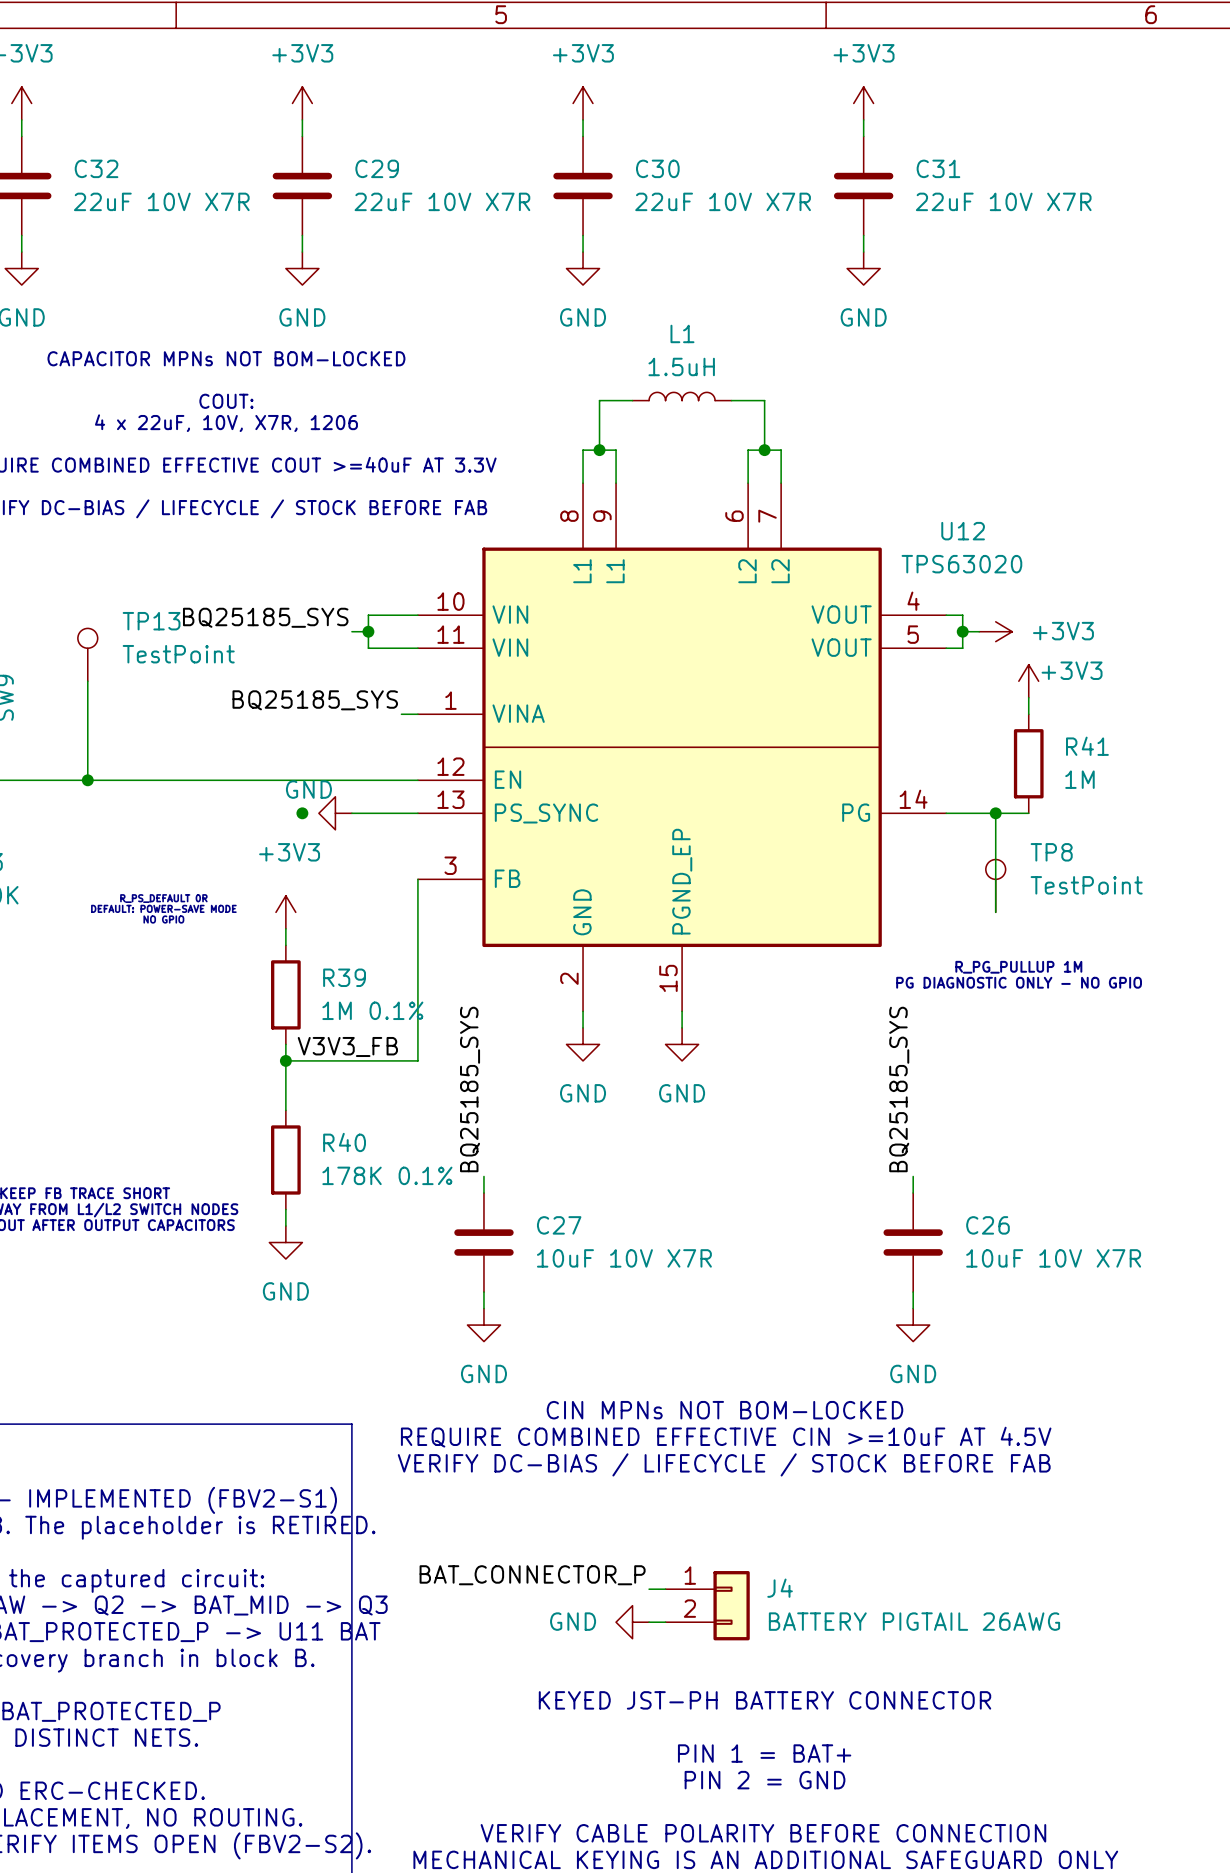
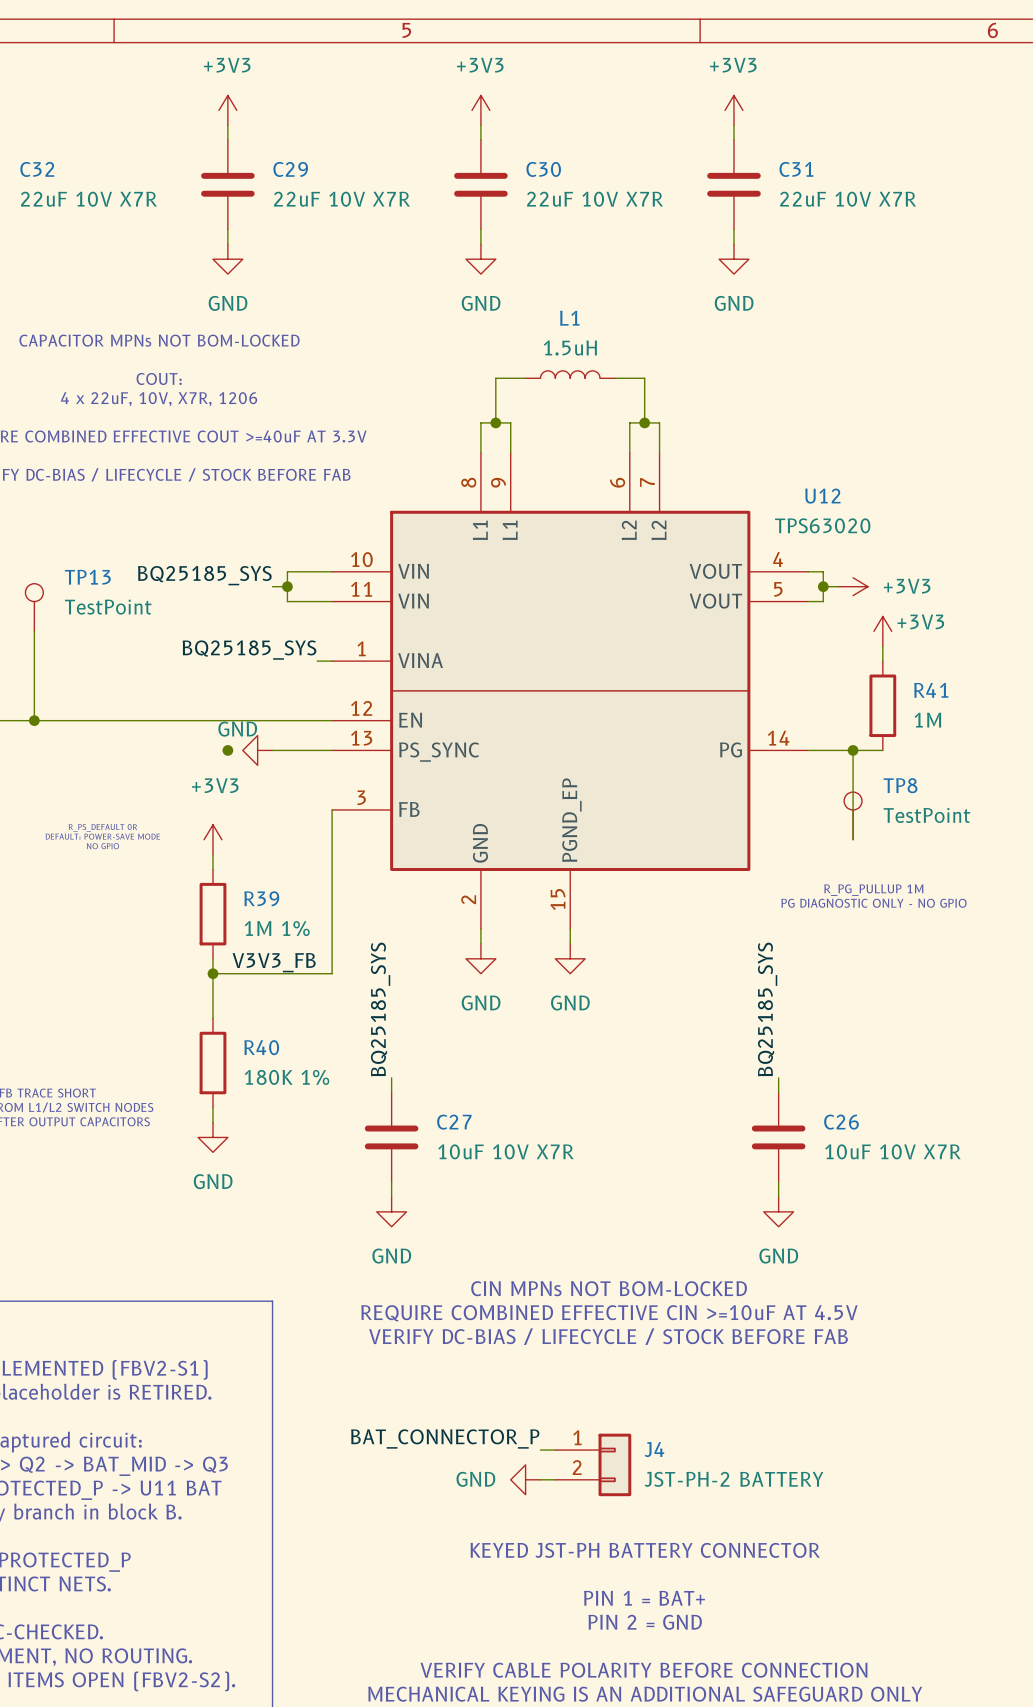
R39 value: 1M 0.1% (372, 1010) -> 1M 1% (277, 928)
R40 value: 178K 0.1% (387, 1175) -> 180K 1% (286, 1077)
J4 value: BATTERY PIGTAIL 26AWG (914, 1621) -> JST-PH-2 BATTERY (733, 1479)

